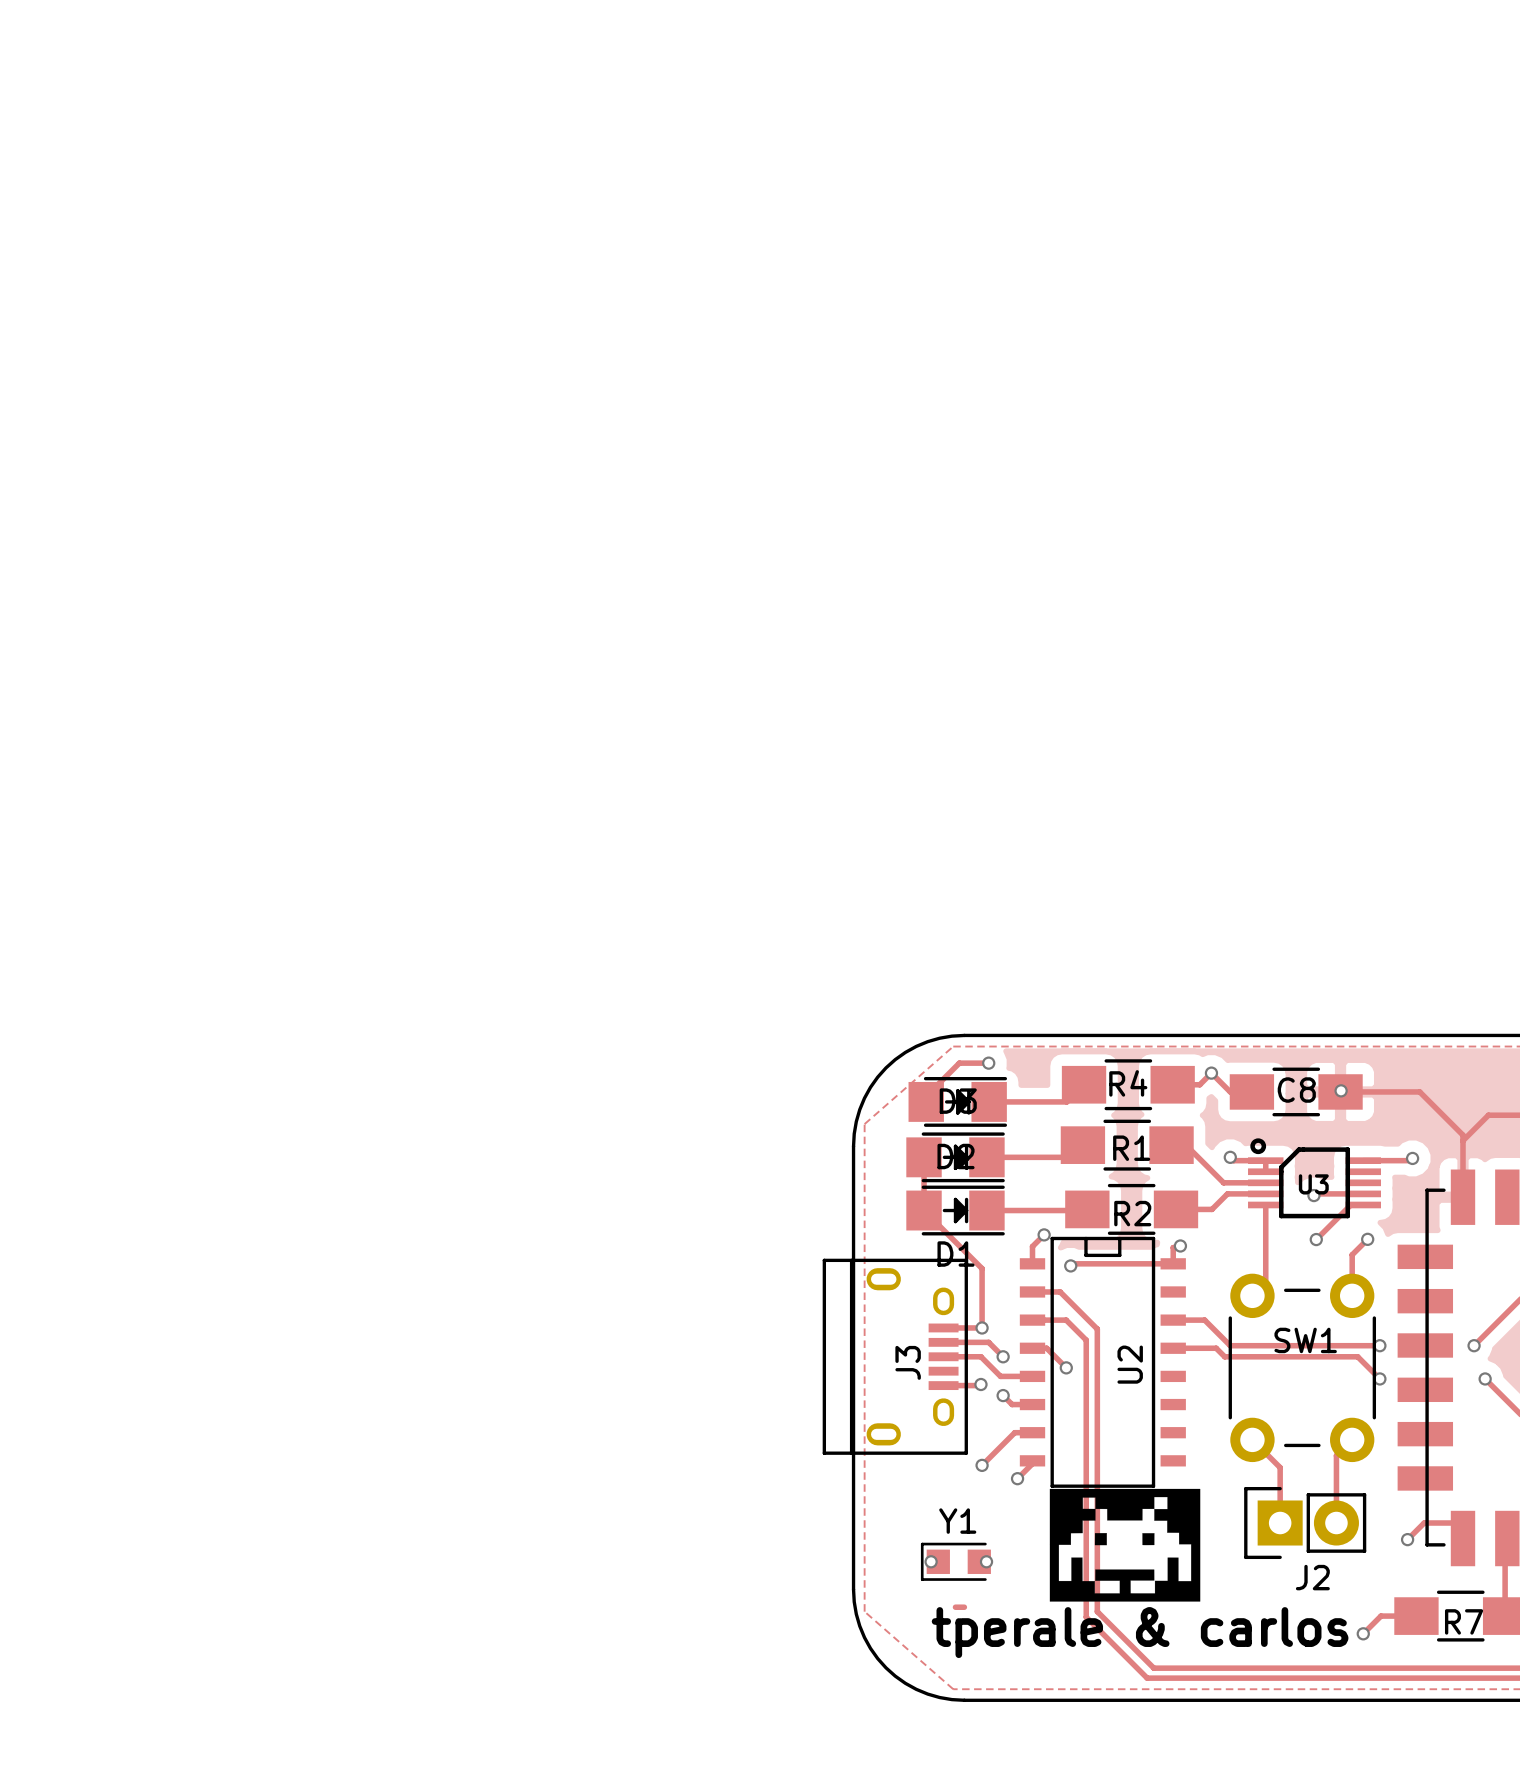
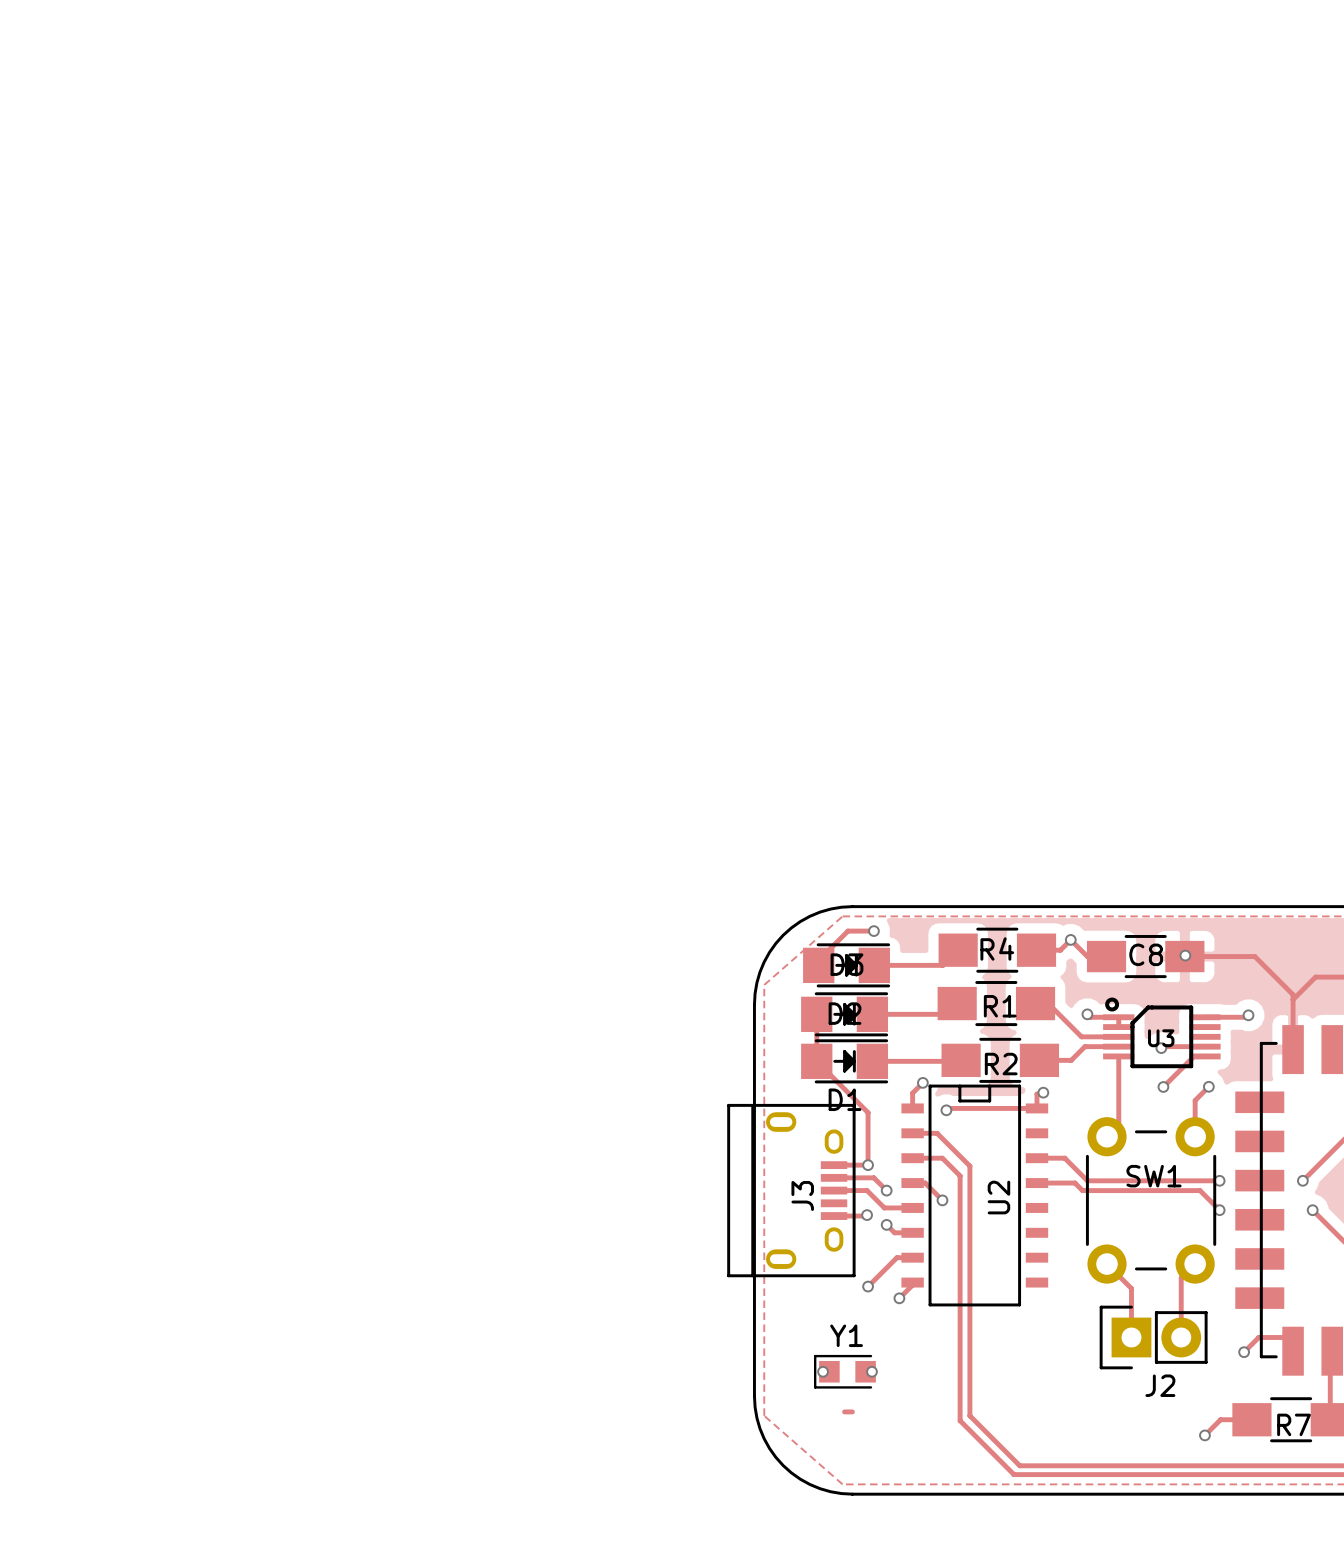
drawing: [1049, 1488, 1201, 1602] -> none
text: tperale & carlos (1140, 1632) -> none

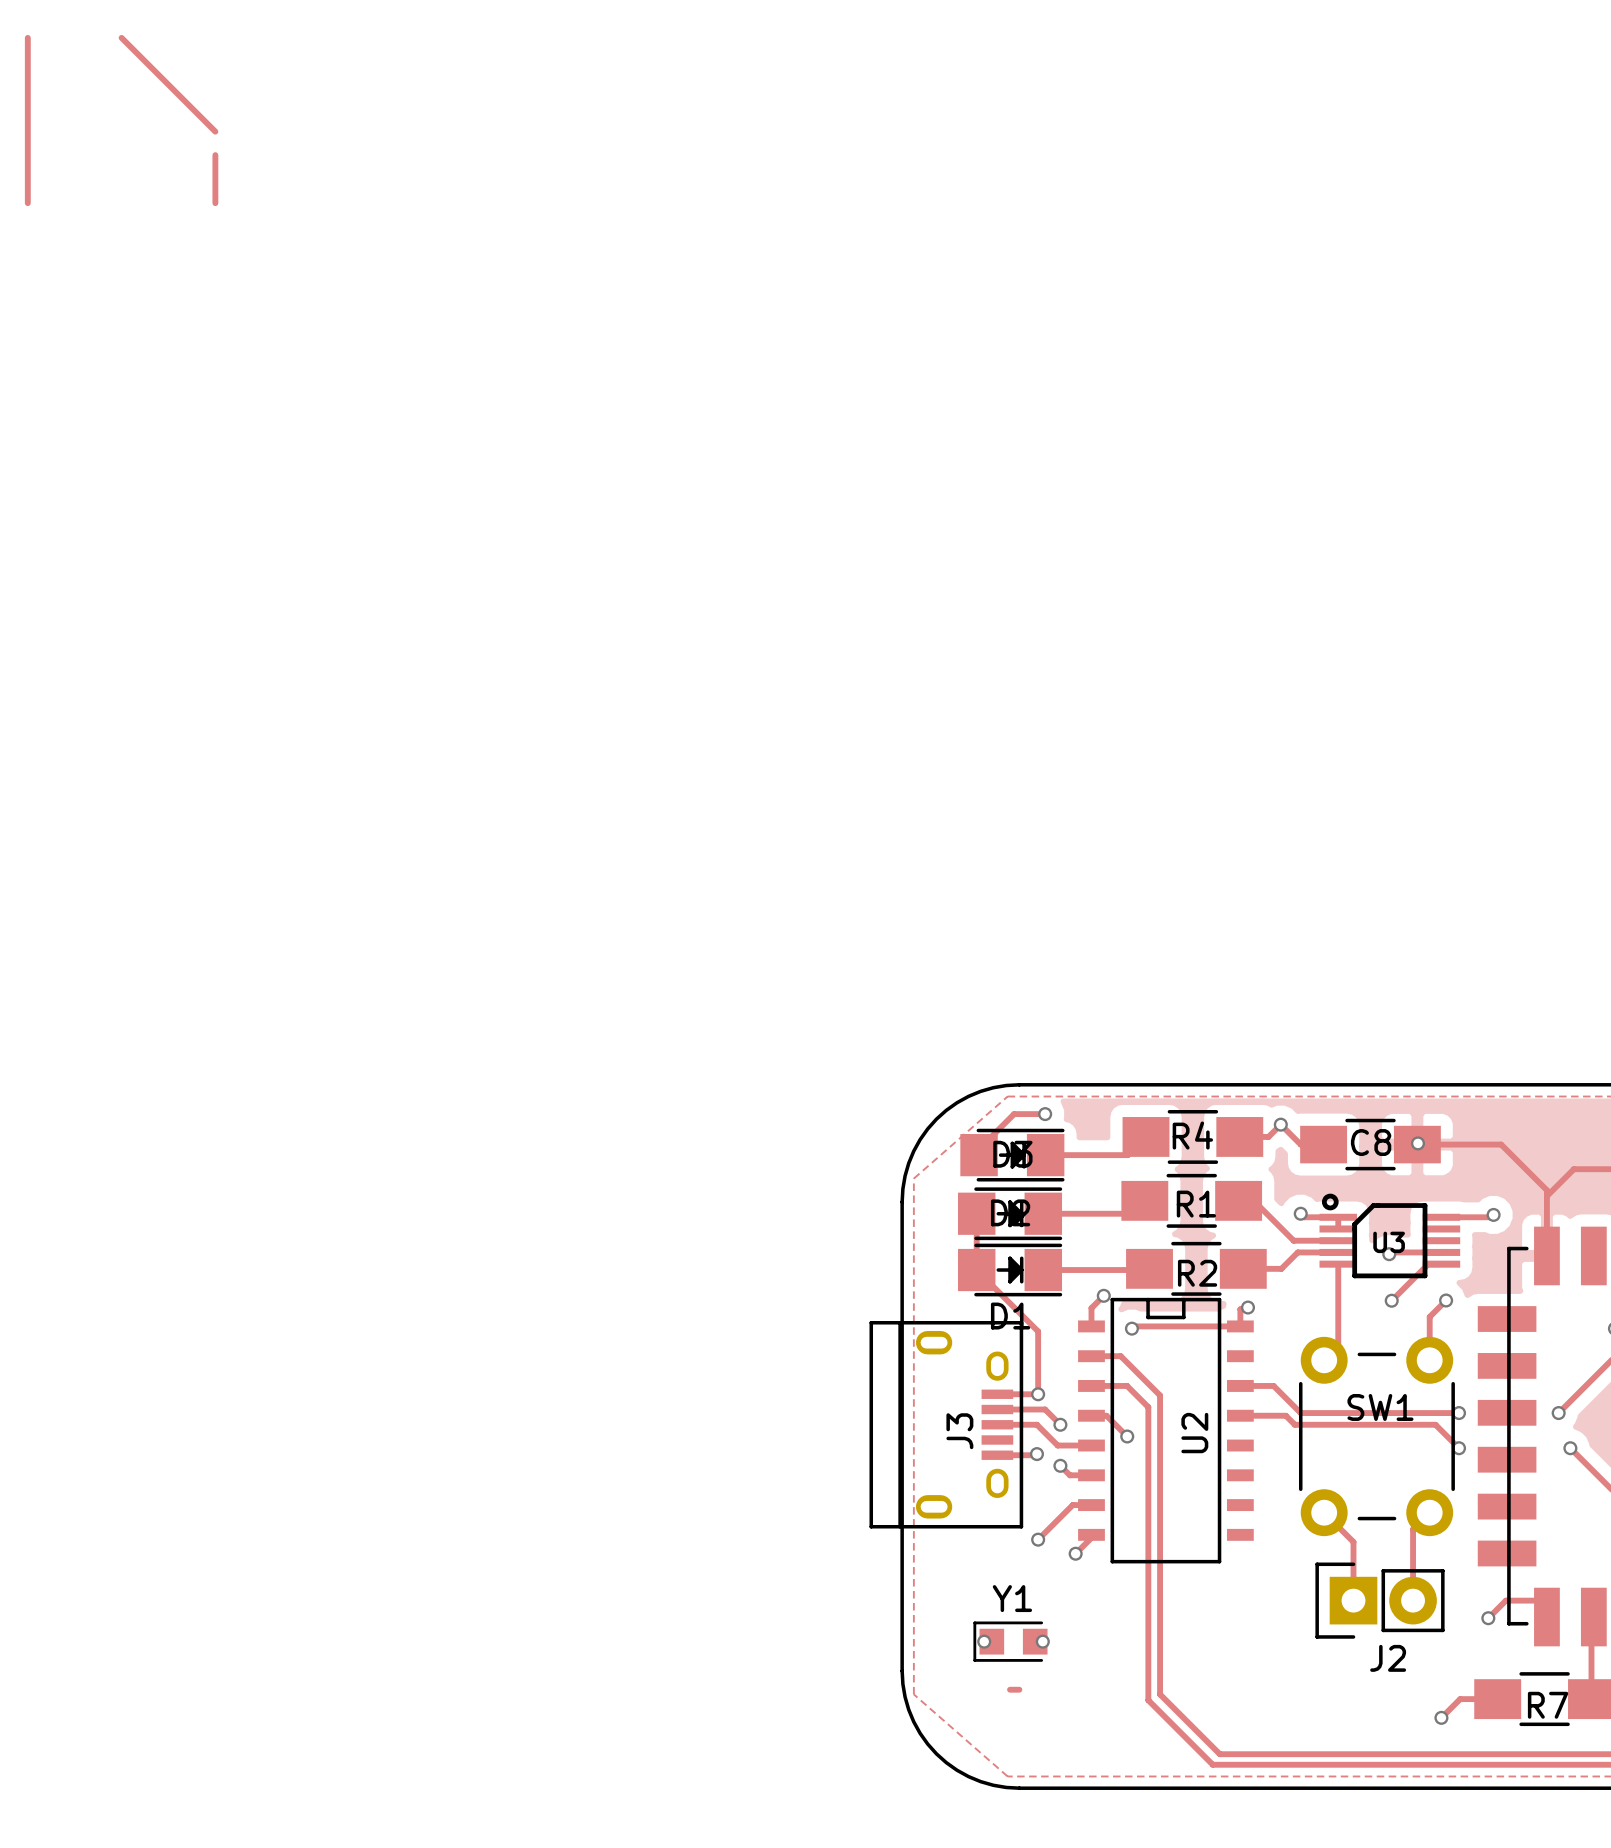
track: none -> (27, 37) (27, 203)
track: none -> (121, 37) (215, 131)
track: none -> (215, 155) (215, 203)

